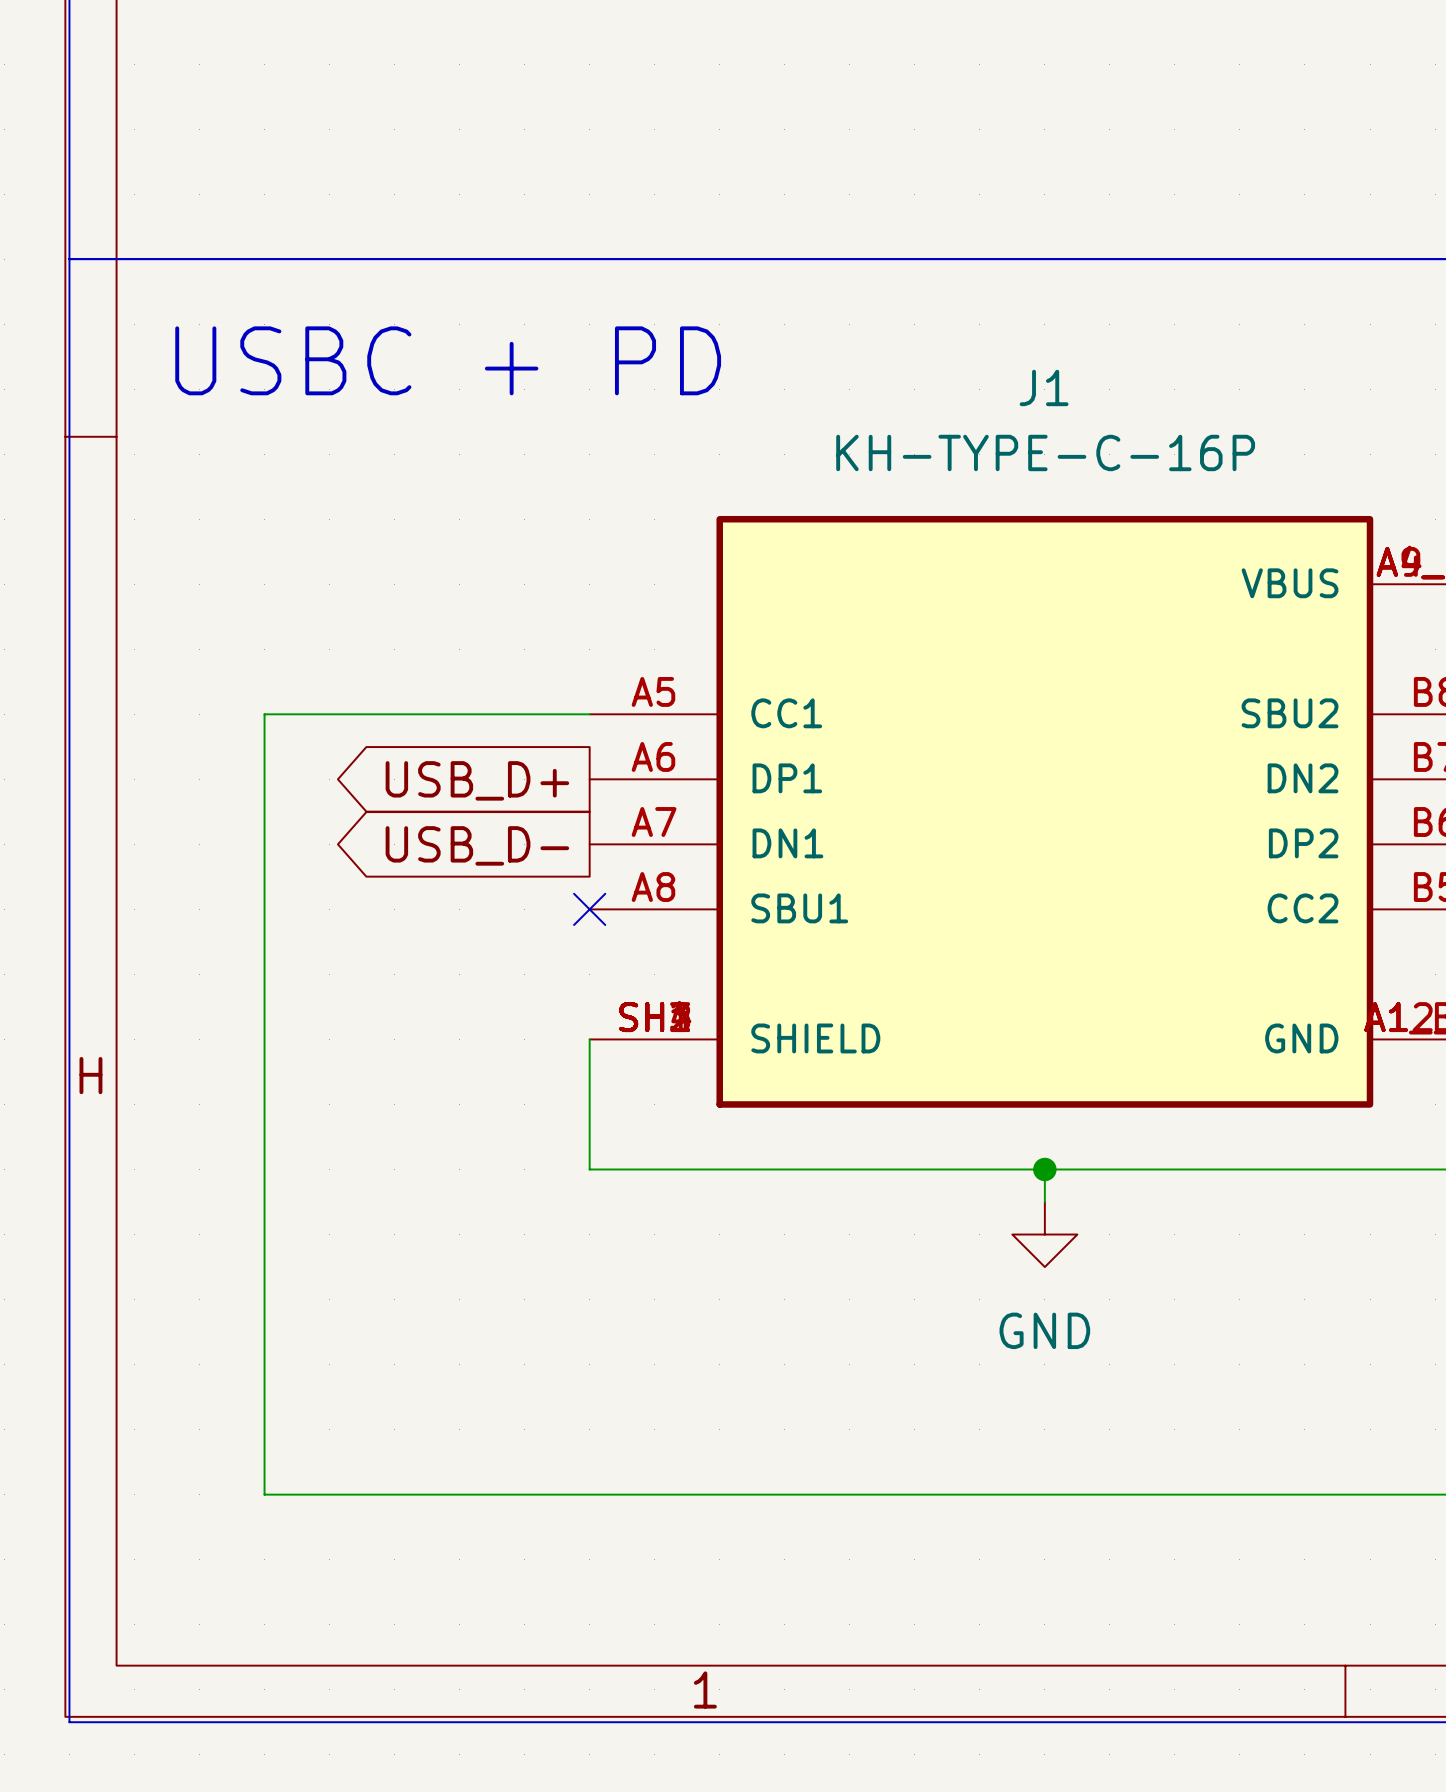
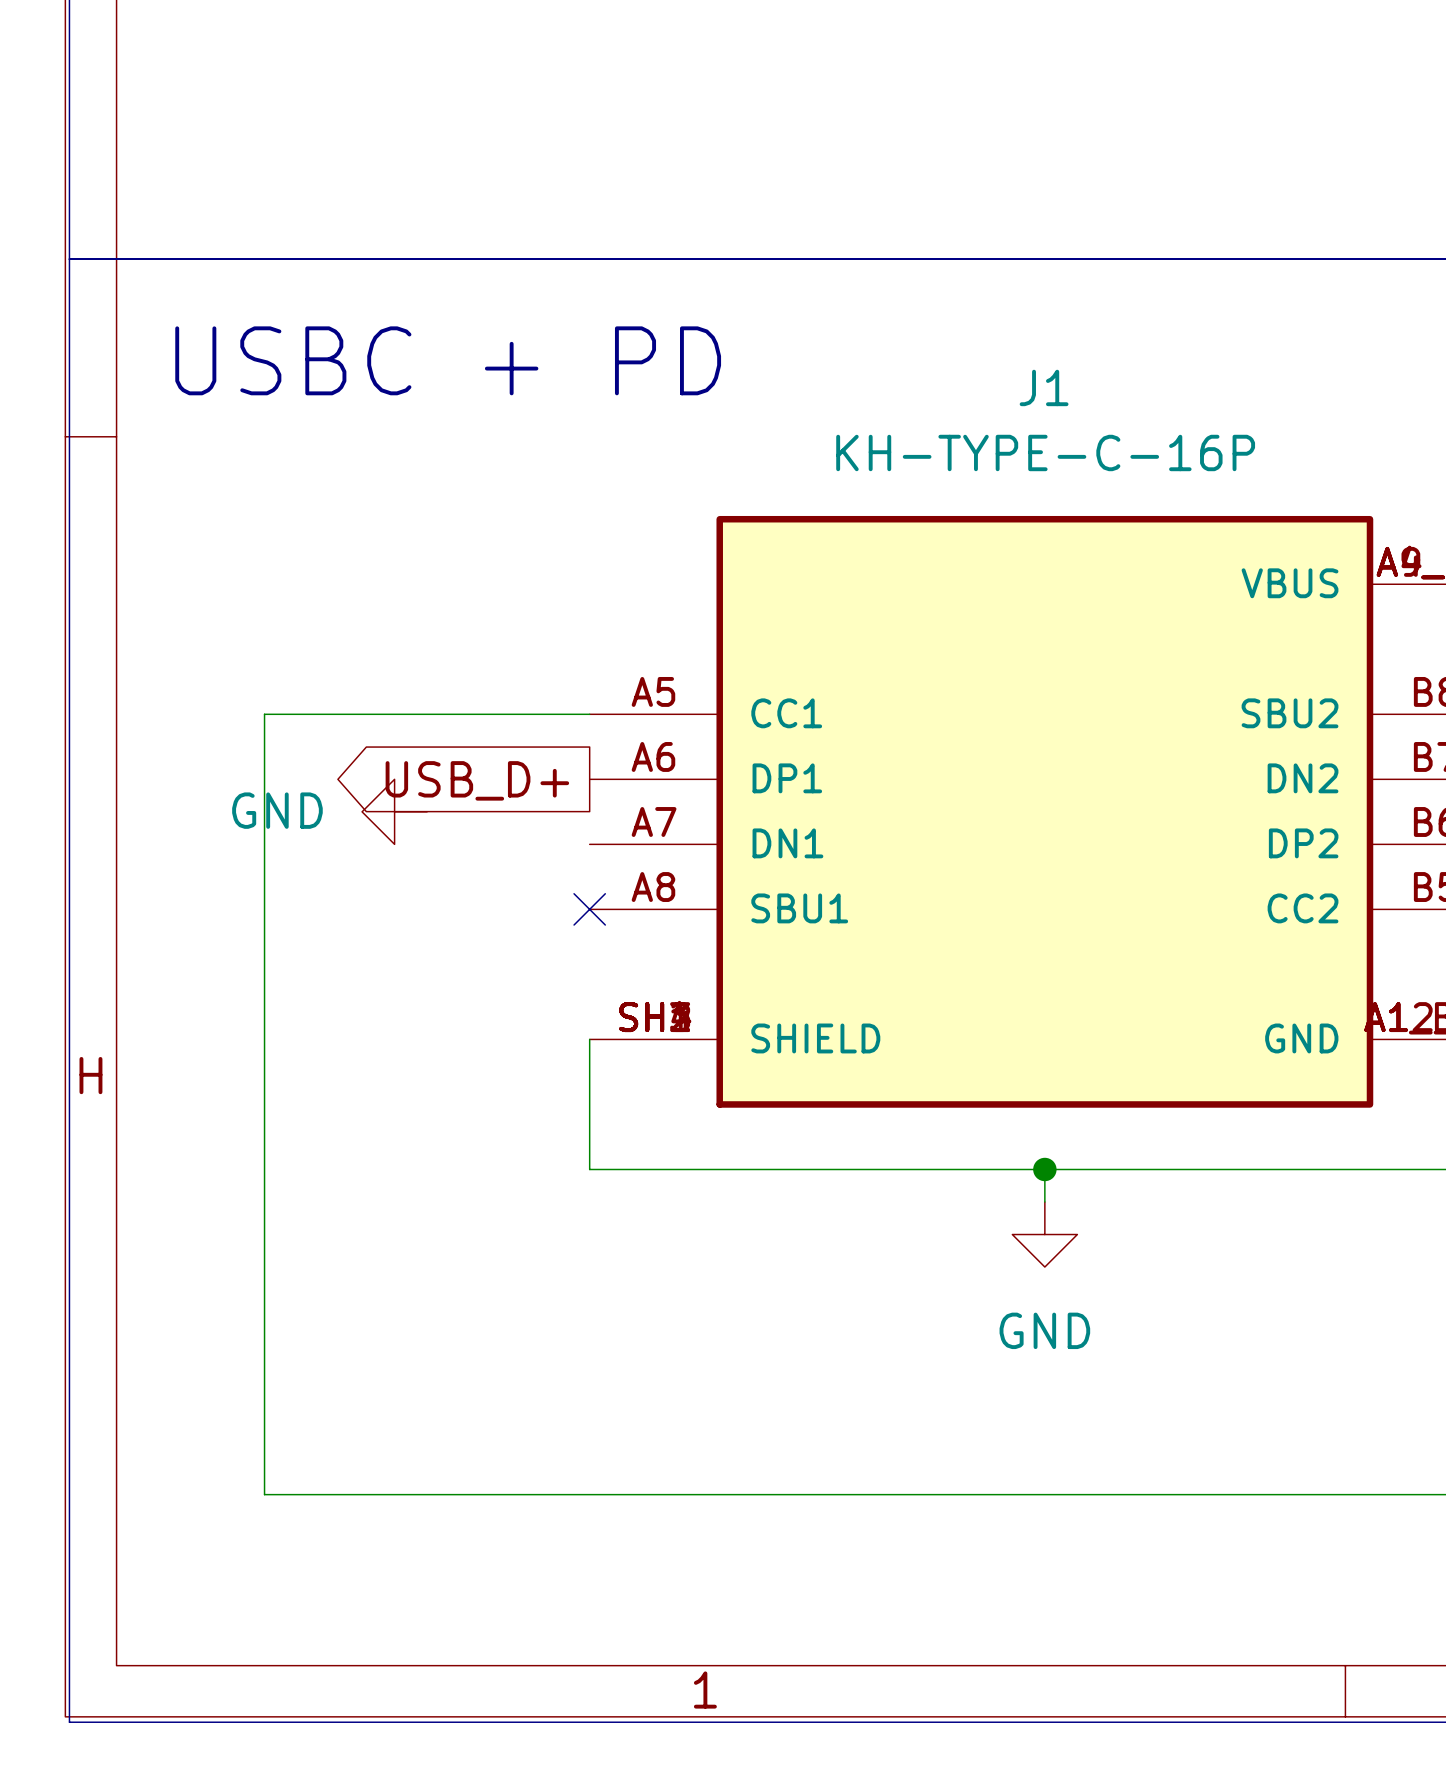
power symbol: none -> GND (394, 811)
global label: USB_D- (477, 845) -> none

